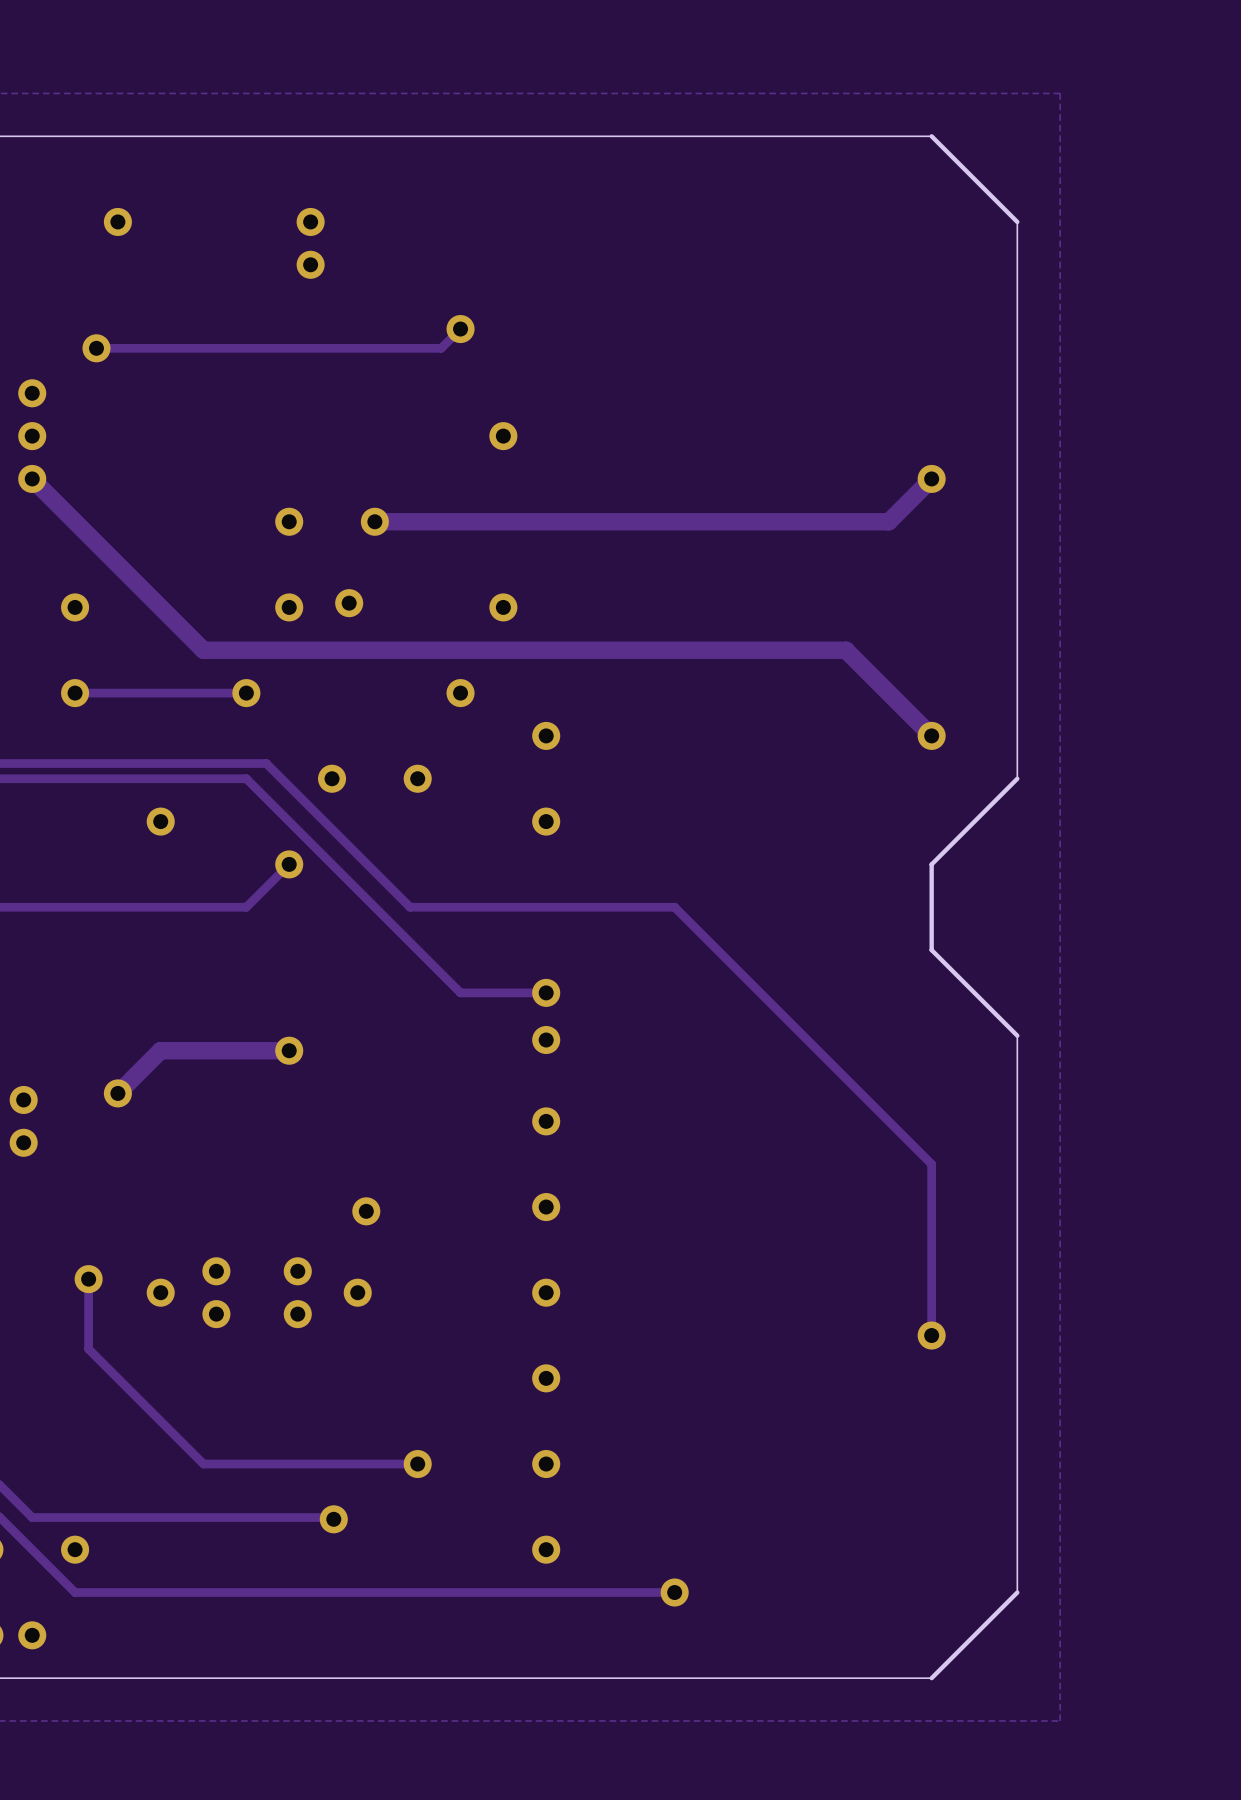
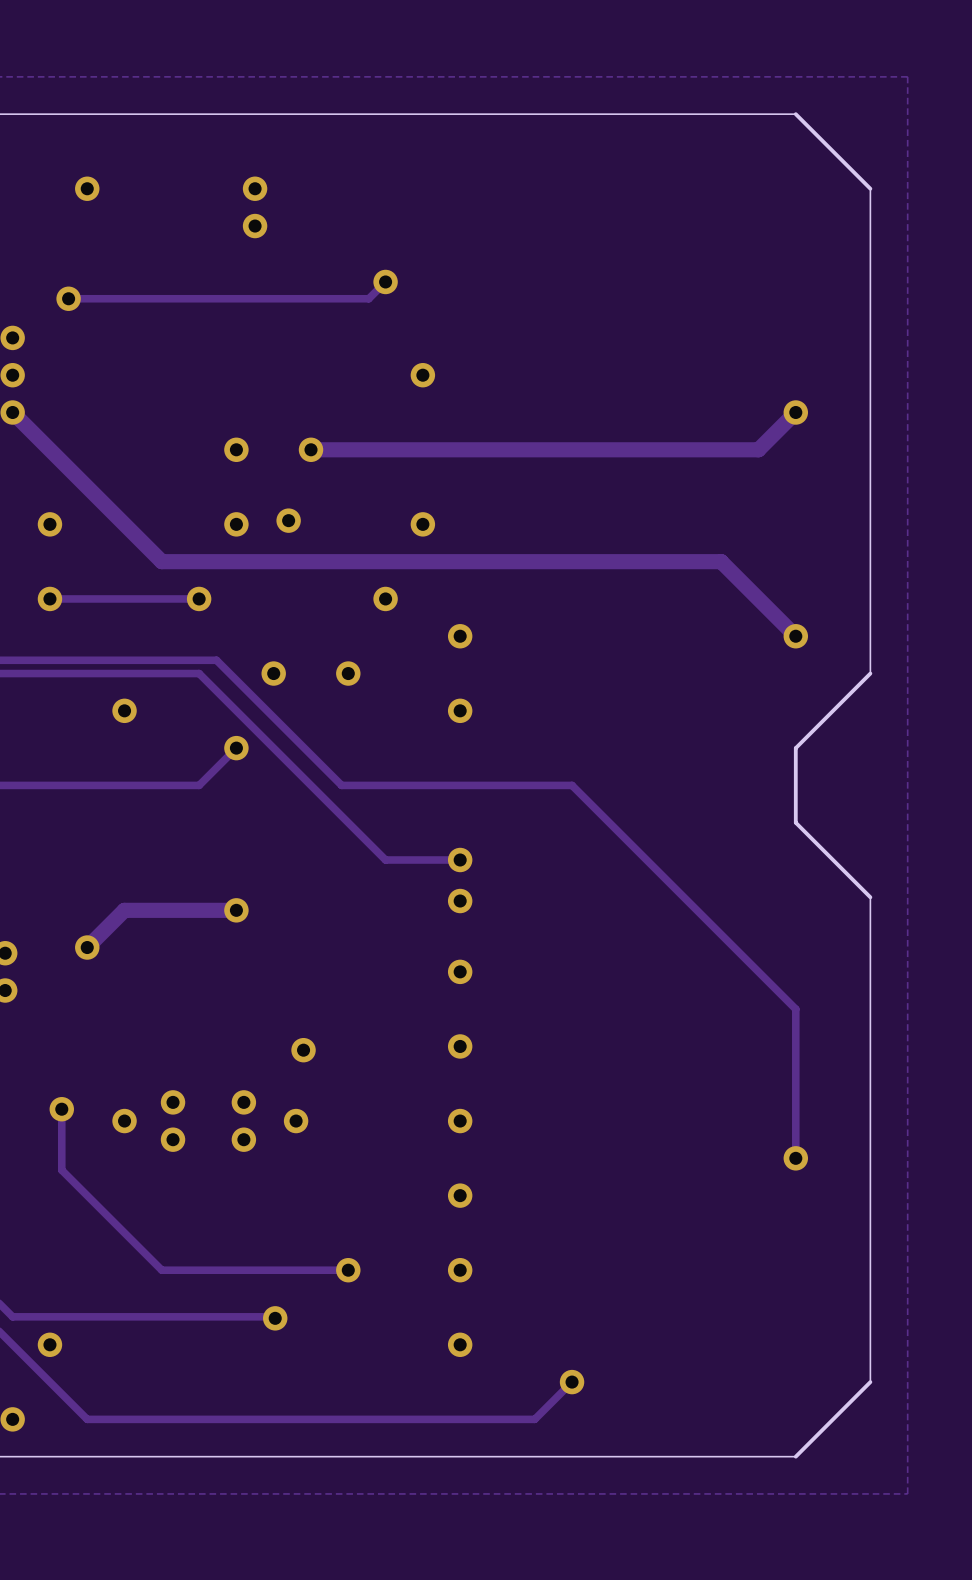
track: (674, 1592) (75, 1592) -> (572, 1382) (534, 1419) (87, 1419) (49, 1382)

